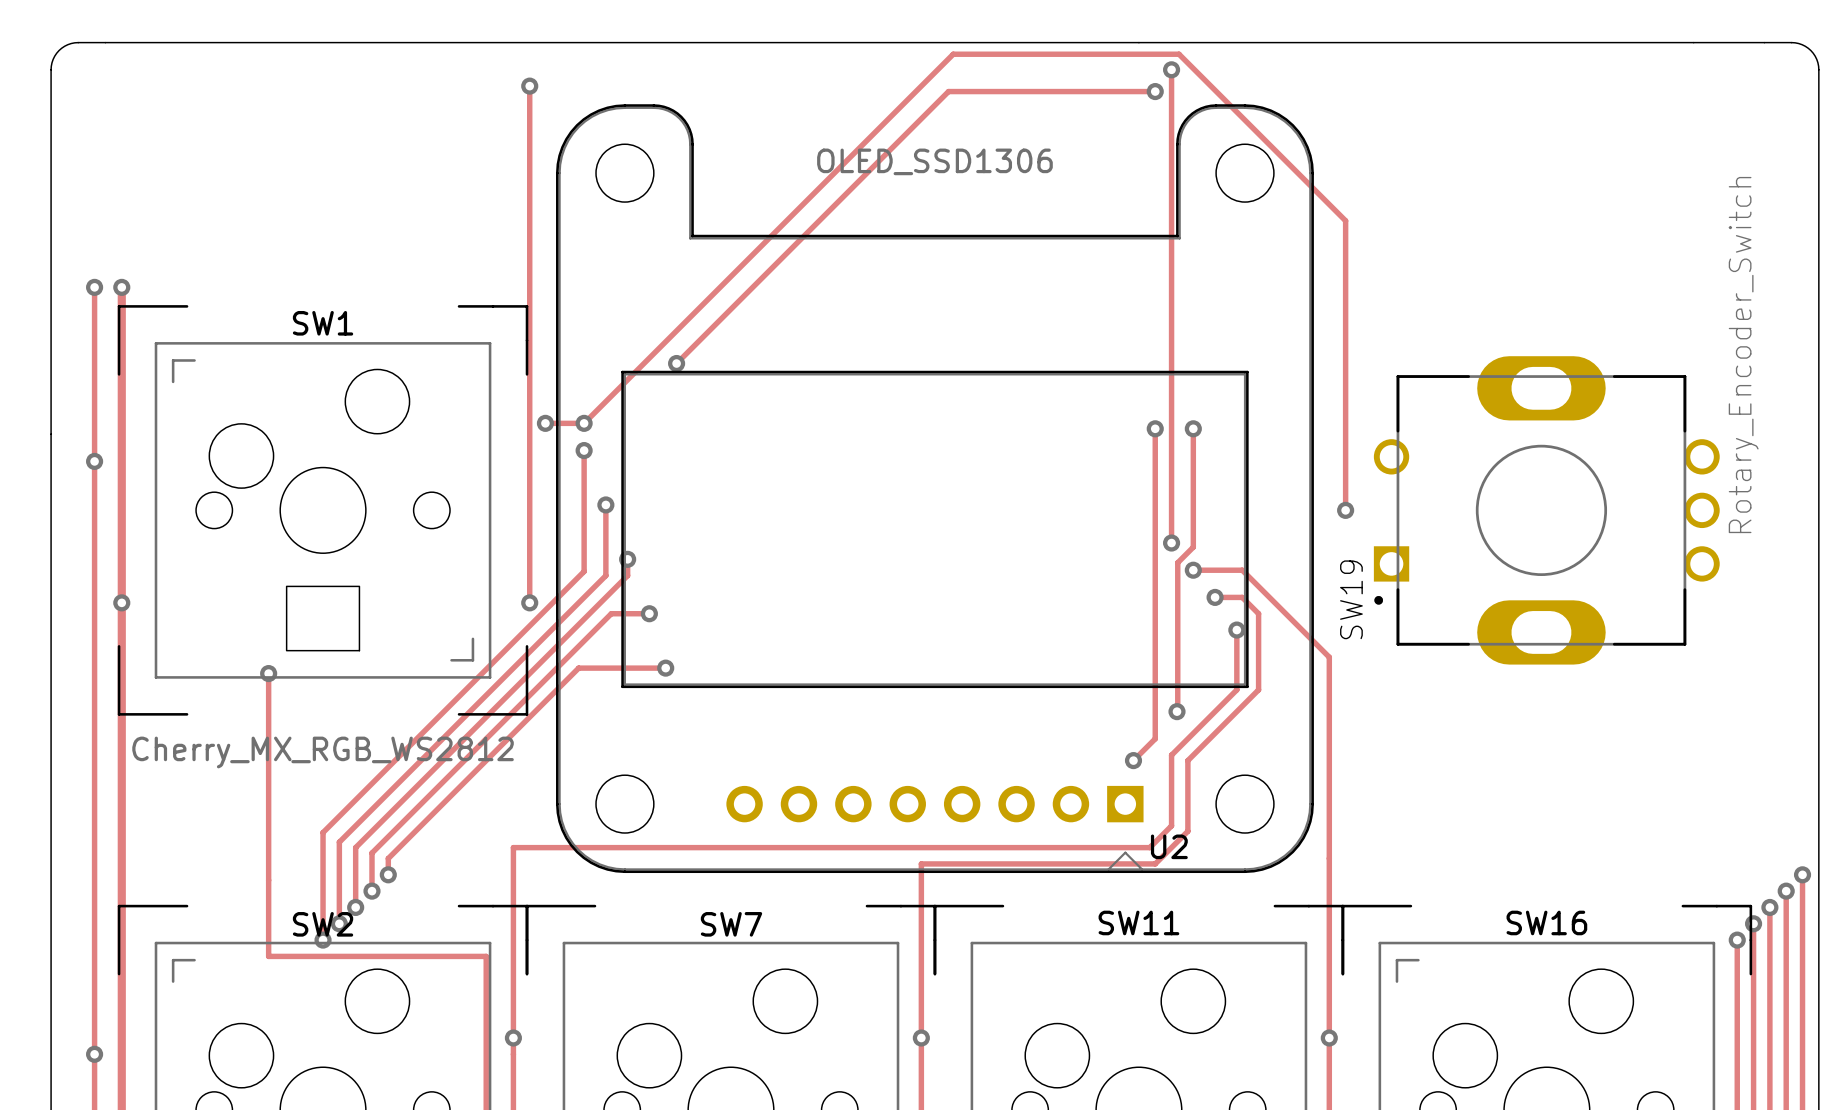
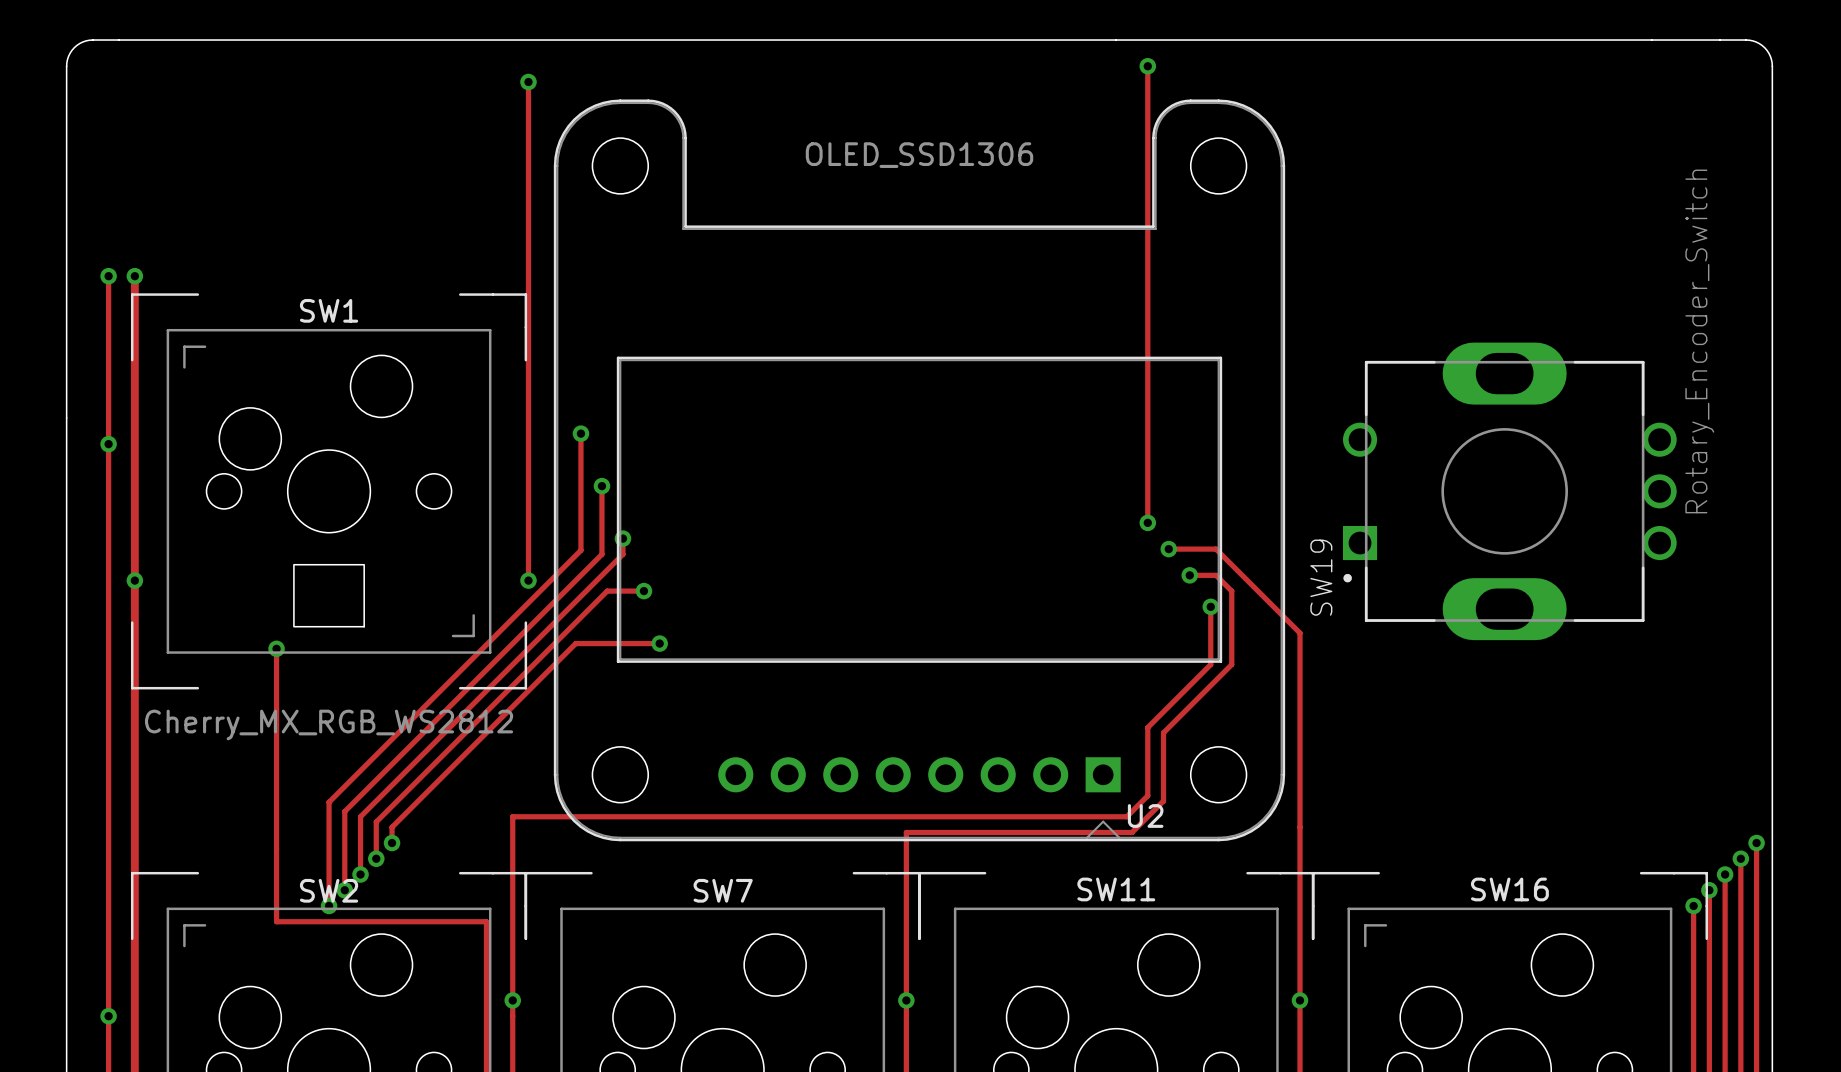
track: (1155, 91) (948, 91) (676, 363) -> none
via: (1155, 91) -> none
via: (676, 363) -> none
track: (545, 423) (584, 423) (953, 54) (1179, 54) (1345, 220) (1345, 510) -> none
via: (545, 423) -> none
via: (584, 423) -> none
track: (1155, 428) (1155, 738) (1133, 760) -> none
via: (1155, 428) -> none
track: (1193, 428) (1193, 547) (1177, 562) (1177, 711) -> none
via: (1193, 428) -> none
via: (1345, 510) -> none
via: (1177, 711) -> none
via: (1133, 760) -> none

